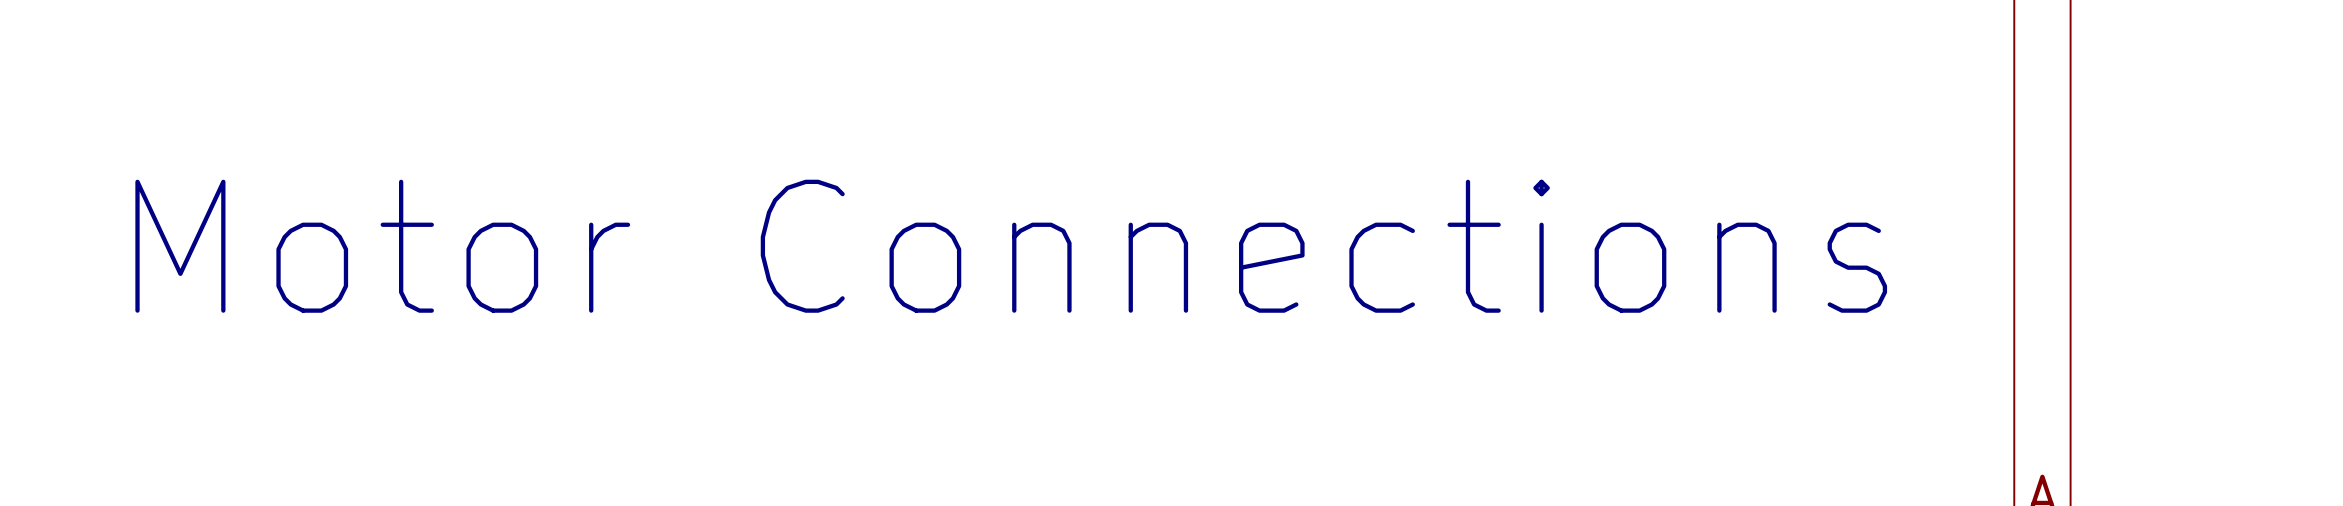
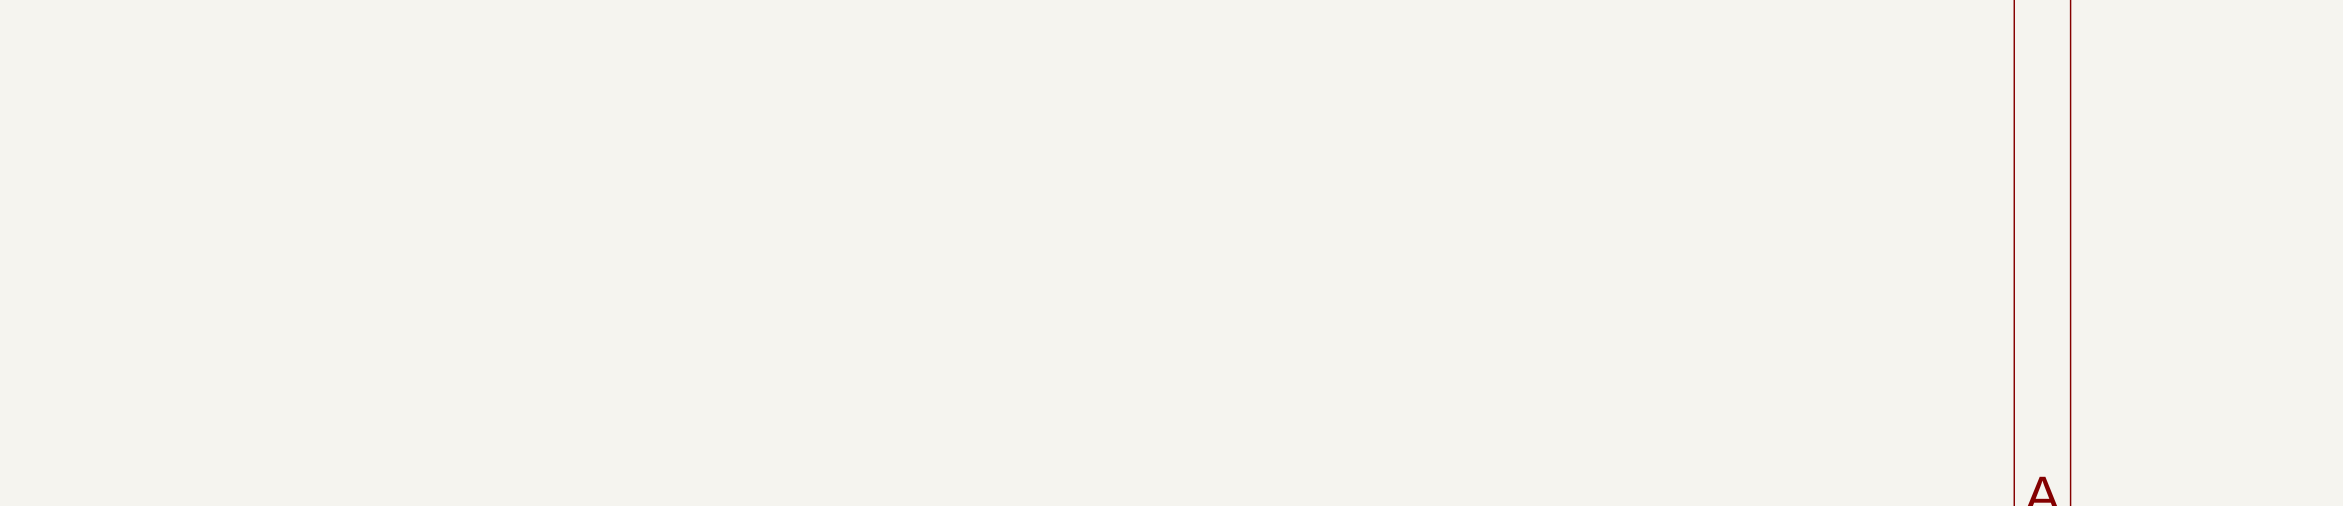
text: Motor Connections (1011, 246) -> none

